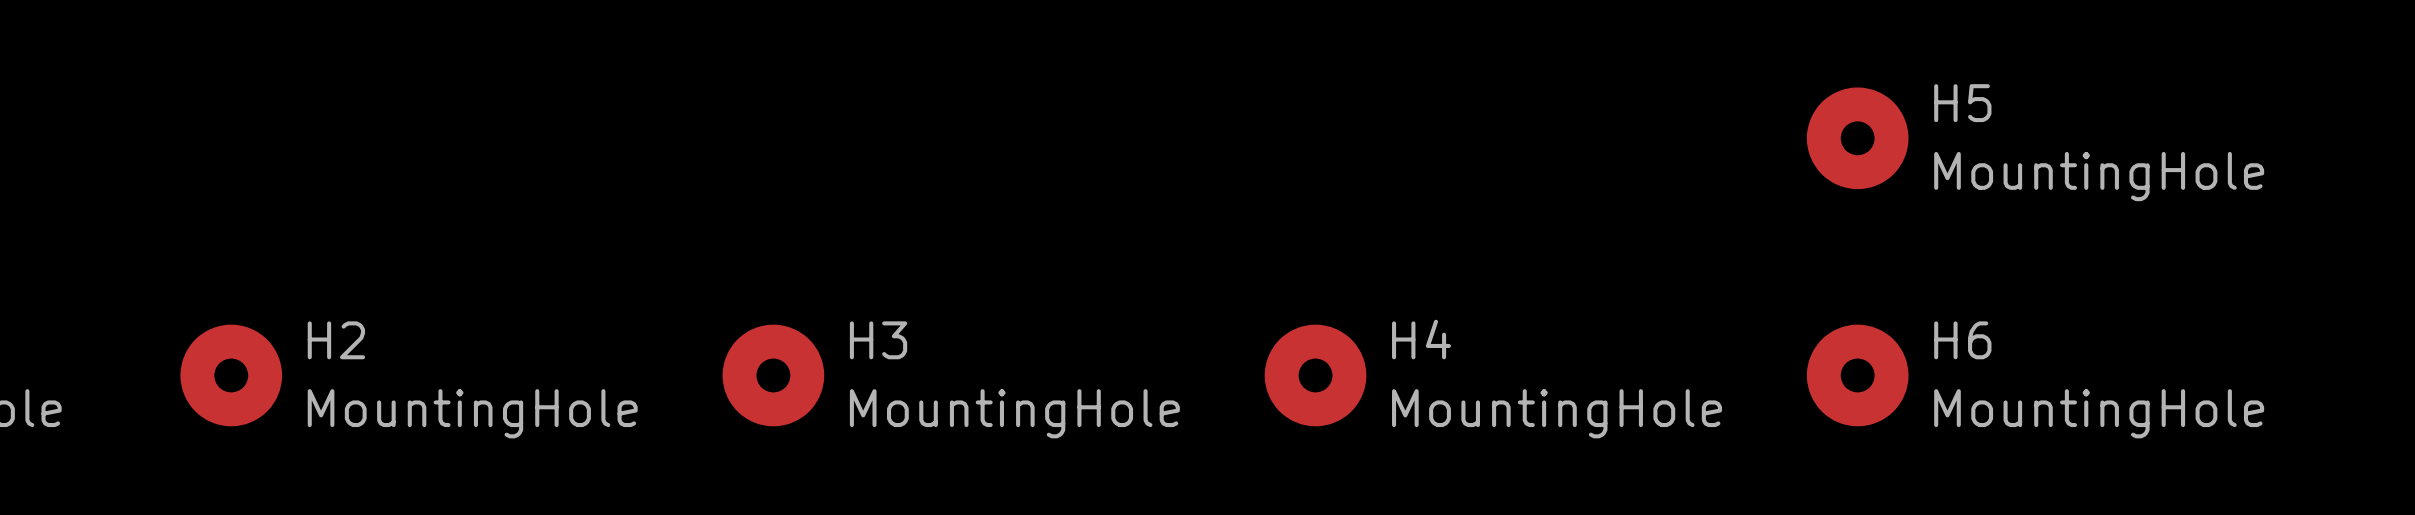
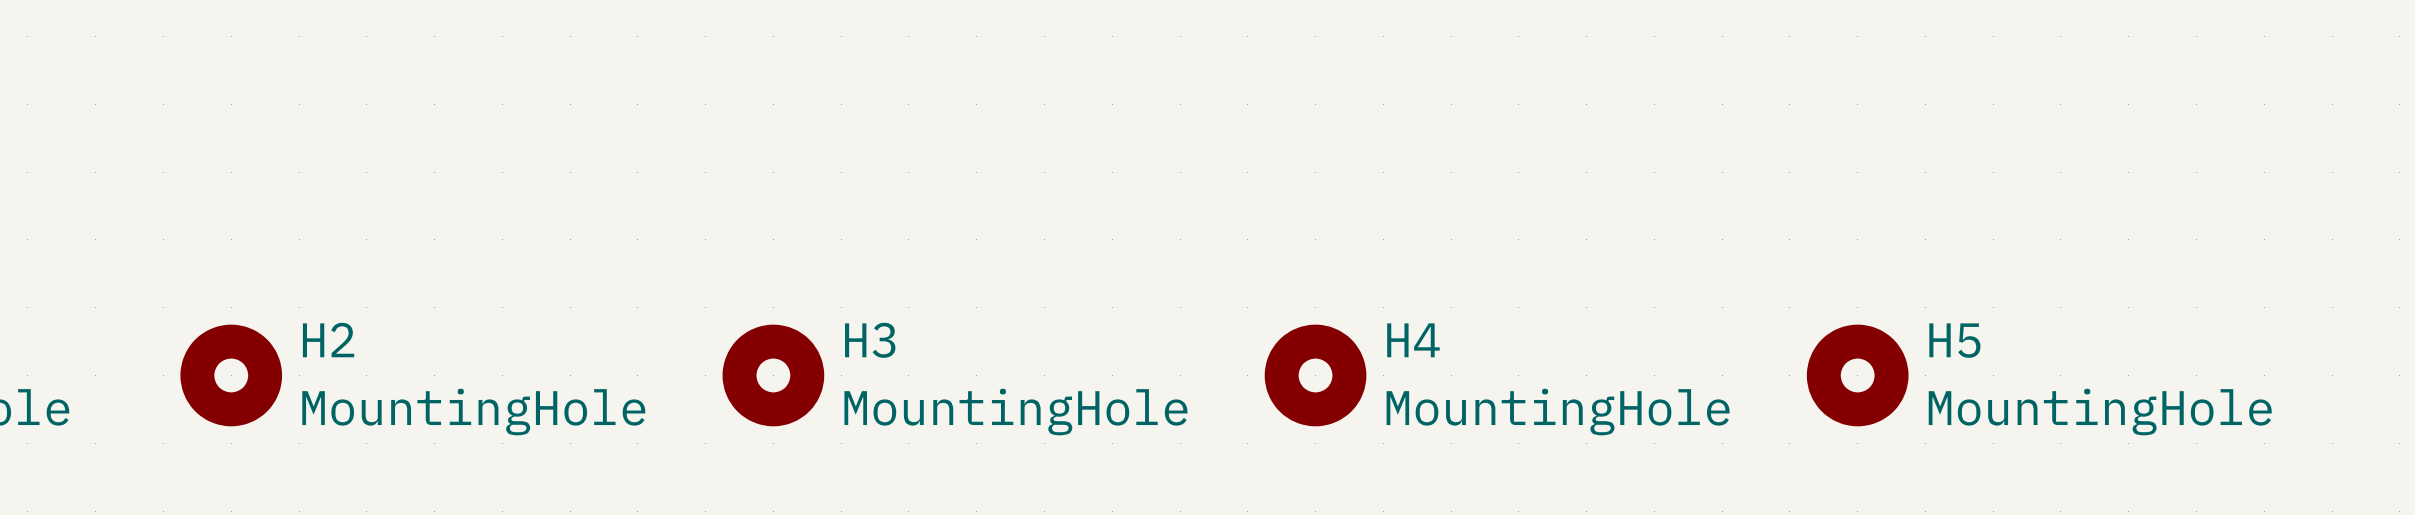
H5: MountingHole (1857, 138) -> none
H6 name: H6 (1962, 340) -> H5 (1954, 340)

